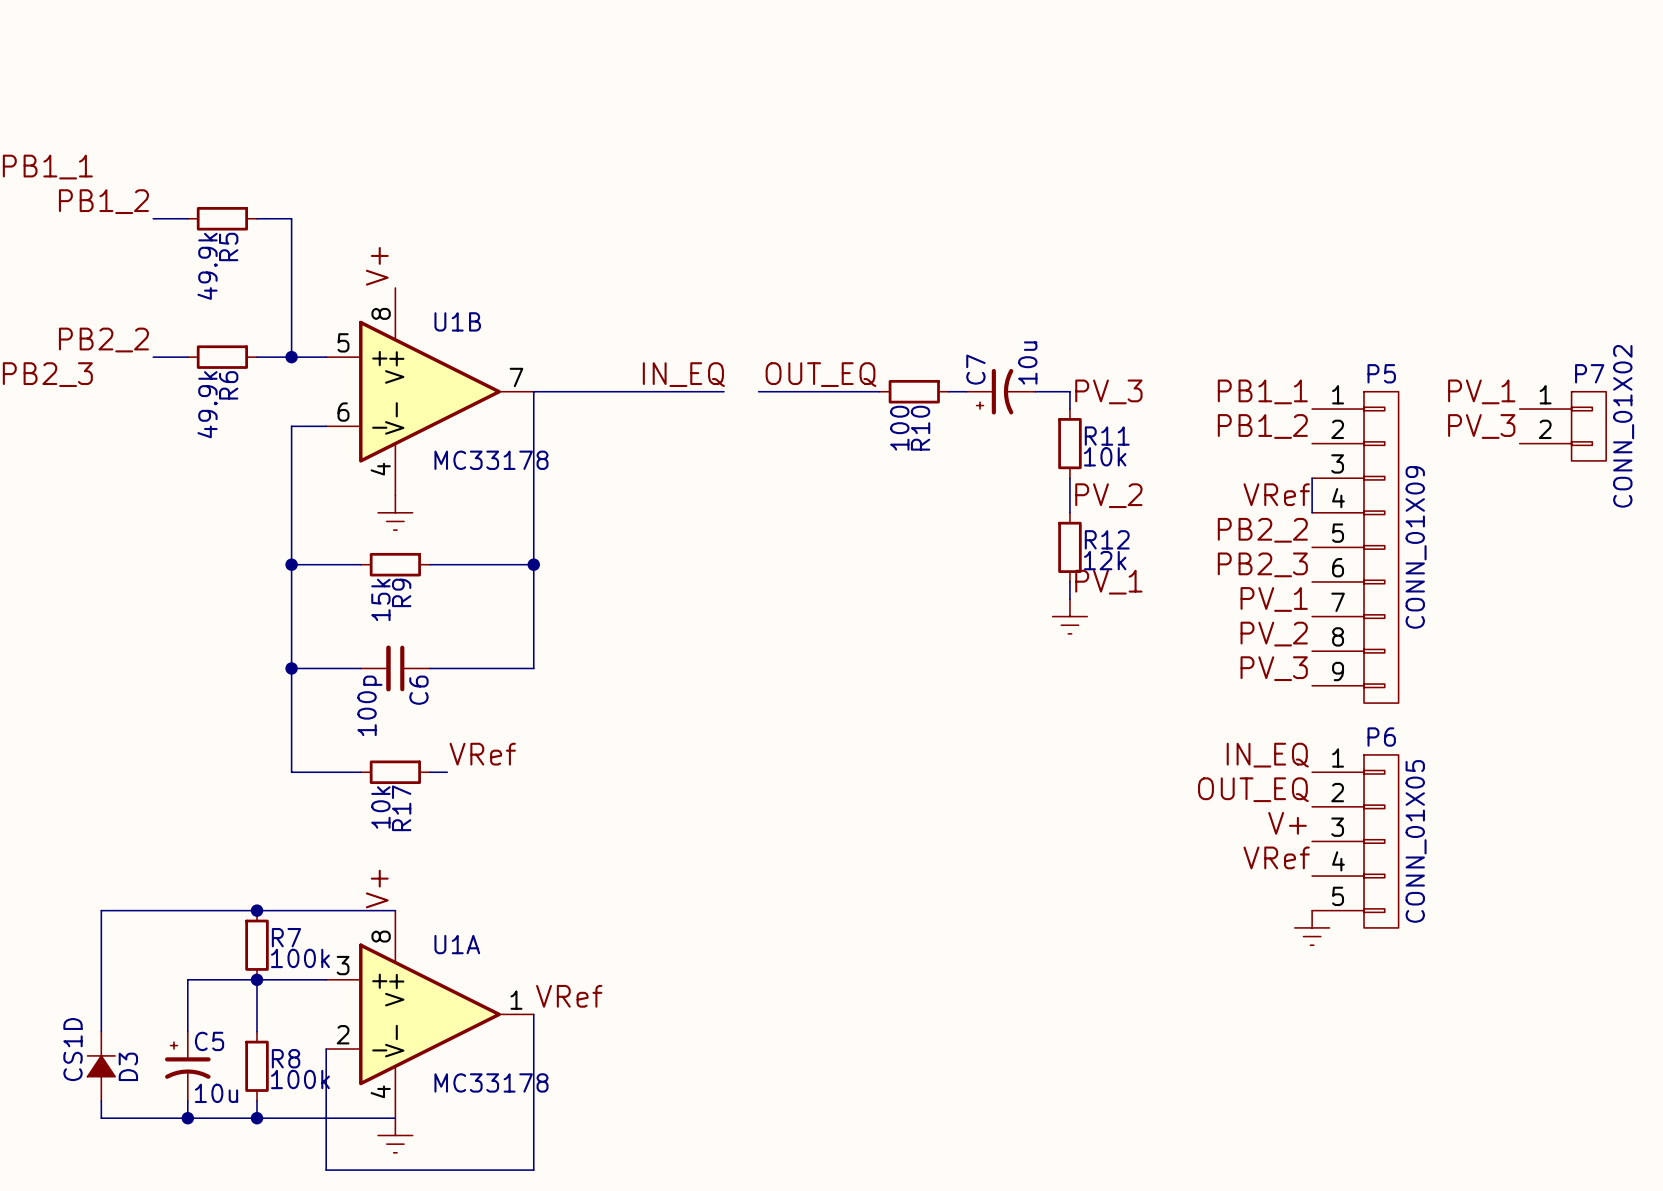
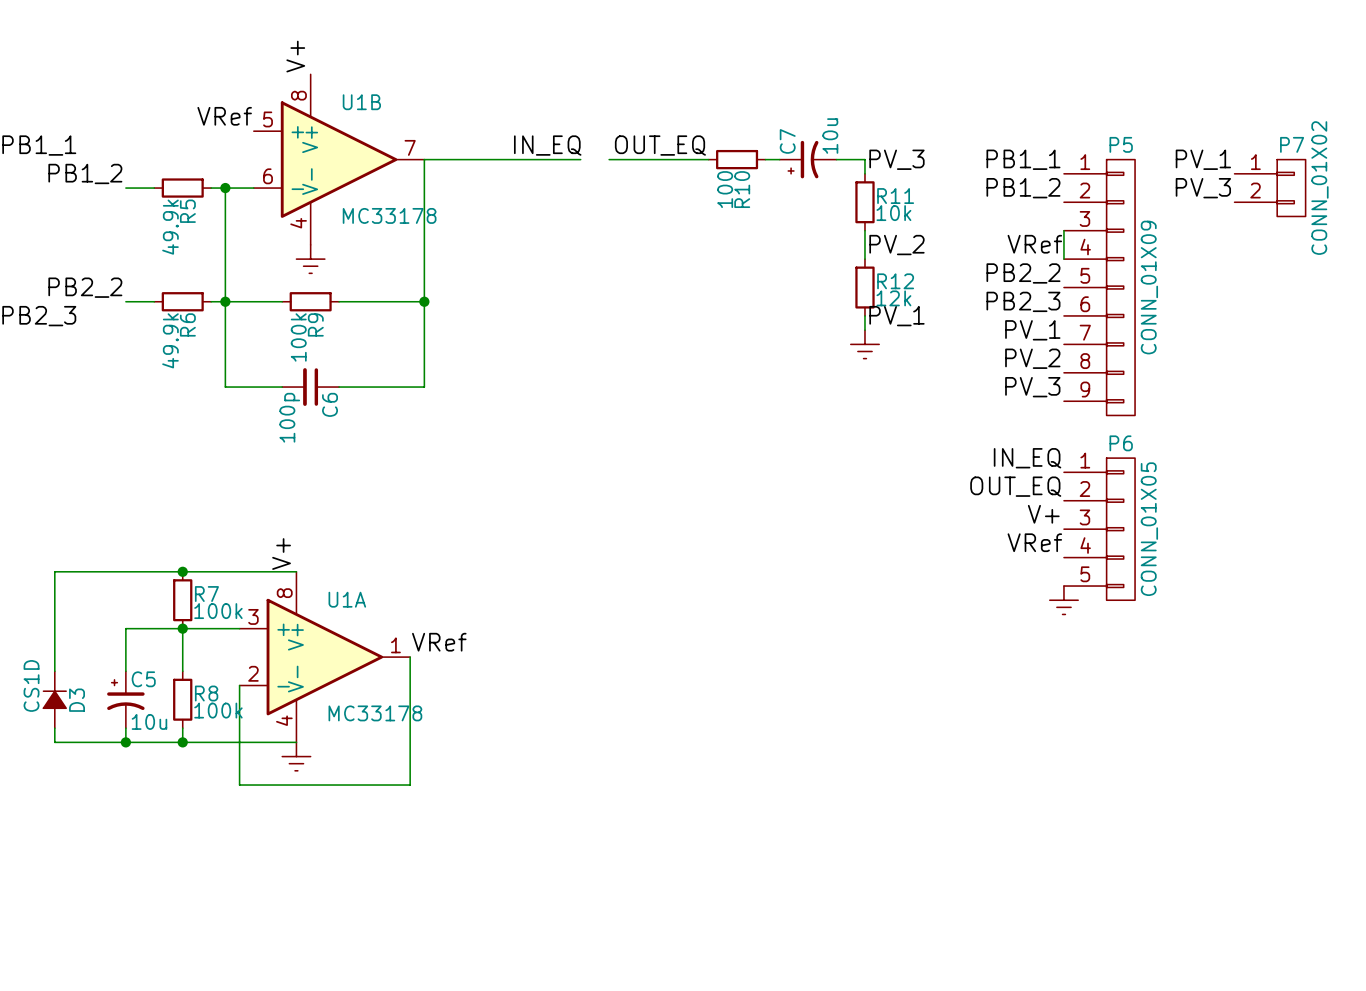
label: none -> V+ (295, 56)
label: none -> VRef (224, 116)
label: none -> PV_3 (896, 159)
label: none -> PV_1 (1203, 159)
wire: none -> (225, 188) (225, 387) (282, 387)
junction: none -> (225, 188)
wire: (291, 218) (291, 357) -> (239, 188) (253, 188)
label: none -> PV_3 (1203, 188)
label: V+ (377, 266) -> none
label: none -> VRef (1034, 244)
label: none -> PV_2 (896, 245)
power symbol: none -> (310, 259)
junction position: (291, 357) -> (225, 301)
junction: none -> (424, 301)
label position: IN_EQ (683, 374) -> IN_EQ (547, 145)
label position: OUT_EQ (821, 374) -> OUT_EQ (660, 145)
U1B position: (429, 391) -> (339, 159)
wire: (724, 391) (533, 391) (533, 668) (429, 668) -> (580, 159) (424, 159) (424, 387) (339, 387)
wire: (758, 391) (879, 391) -> (609, 159) (708, 159)
R10 position: (914, 391) -> (737, 159)
wire: (948, 391) (966, 391) -> (765, 159) (779, 159)
C7 position: (1000, 391) -> (808, 159)
wire: (1035, 391) (1069, 391) (1069, 409) -> (836, 159) (864, 159) (864, 173)
label: PV_3 (1108, 391) -> PV_1 (896, 316)
label: none -> PV_1 (1032, 330)
label position: PB1_1 (1262, 391) -> PB1_1 (1023, 159)
label: PV_1 (1481, 391) -> none
power symbol: none -> (864, 344)
wire: (326, 426) (291, 426) (291, 772) (360, 772) -> none
label: none -> PV_2 (1032, 358)
label position: PB1_2 (1262, 426) -> PB1_2 (1023, 188)
label: PV_3 (1481, 426) -> none
P7 position: (1562, 426) -> (1270, 188)
R11 position: (1069, 443) -> (864, 202)
label: none -> PV_3 (1032, 387)
wire: (1069, 478) (1069, 512) -> (864, 230) (864, 259)
wire: (1312, 478) (1312, 512) -> (1063, 230) (1063, 259)
label: VRef (1276, 494) -> none
label: PV_2 (1108, 495) -> none
power symbol: (395, 512) -> none
label position: PB2_2 (1262, 530) -> PB2_2 (1023, 273)
R12 position: (1069, 547) -> (864, 287)
P5 position: (1355, 547) -> (1099, 287)
wire: (291, 564) (360, 564) -> none
junction: (291, 564) -> none
R9 position: (395, 564) -> (310, 301)
wire: (429, 564) (533, 564) -> (339, 301) (424, 301)
junction: (533, 564) -> none
label position: PB2_3 (1262, 564) -> PB2_3 (1023, 301)
wire: (1069, 581) (1069, 599) -> (864, 315) (864, 330)
label: PV_1 (1108, 582) -> none
R9 value: 15k (380, 599) -> 100k (298, 337)
label: PV_1 (1274, 599) -> none
power symbol: (1069, 616) -> none
label: PV_2 (1274, 634) -> none
label: none -> VRef (1034, 542)
label: none -> V+ (281, 554)
wire: (291, 668) (360, 668) -> none
junction: (291, 668) -> none
C6 position: (395, 668) -> (310, 387)
label: PV_3 (1274, 668) -> none
junction: none -> (182, 571)
power symbol: none -> (1063, 600)
junction: none -> (182, 628)
label position: VRef (482, 754) -> VRef (439, 642)
label position: IN_EQ (1267, 755) -> IN_EQ (1027, 458)
R17: 10k (395, 772) -> none
wire: (429, 772) (447, 772) -> none
label position: OUT_EQ (1253, 789) -> OUT_EQ (1015, 486)
label position: V+ (1287, 823) -> V+ (1043, 514)
P6 position: (1355, 841) -> (1099, 529)
label: VRef (1276, 857) -> none
label: V+ (377, 889) -> none
junction: none -> (125, 742)
junction position: (257, 910) -> (182, 742)
power symbol: none -> (296, 756)
wire: (395, 910) (101, 910) (101, 1031) -> (296, 571) (54, 571) (54, 671)
power symbol: (1312, 927) -> none
R7 position: (257, 945) -> (182, 600)
wire: (257, 979) (257, 1031) -> (182, 628) (182, 671)
junction: (257, 979) -> none
wire: (326, 979) (187, 979) (187, 1031) -> (239, 628) (125, 628) (125, 671)
label: VRef (569, 996) -> none
U1A position: (429, 1014) -> (324, 657)
wire: (533, 1014) (533, 1170) (326, 1170) (326, 1049) -> (410, 657) (410, 785) (239, 785) (239, 685)
D3 position: (101, 1066) -> (54, 699)
C5 position: (187, 1066) -> (125, 699)
R8 position: (257, 1066) -> (182, 699)
wire: (101, 1100) (101, 1118) (395, 1118) -> (54, 728) (54, 742) (296, 742)
wire: (187, 1100) (187, 1118) -> (125, 728) (125, 742)
wire: (257, 1100) (257, 1118) -> (182, 728) (182, 742)
junction: (187, 1118) -> none
junction: (257, 1118) -> none
power symbol: (395, 1135) -> none

